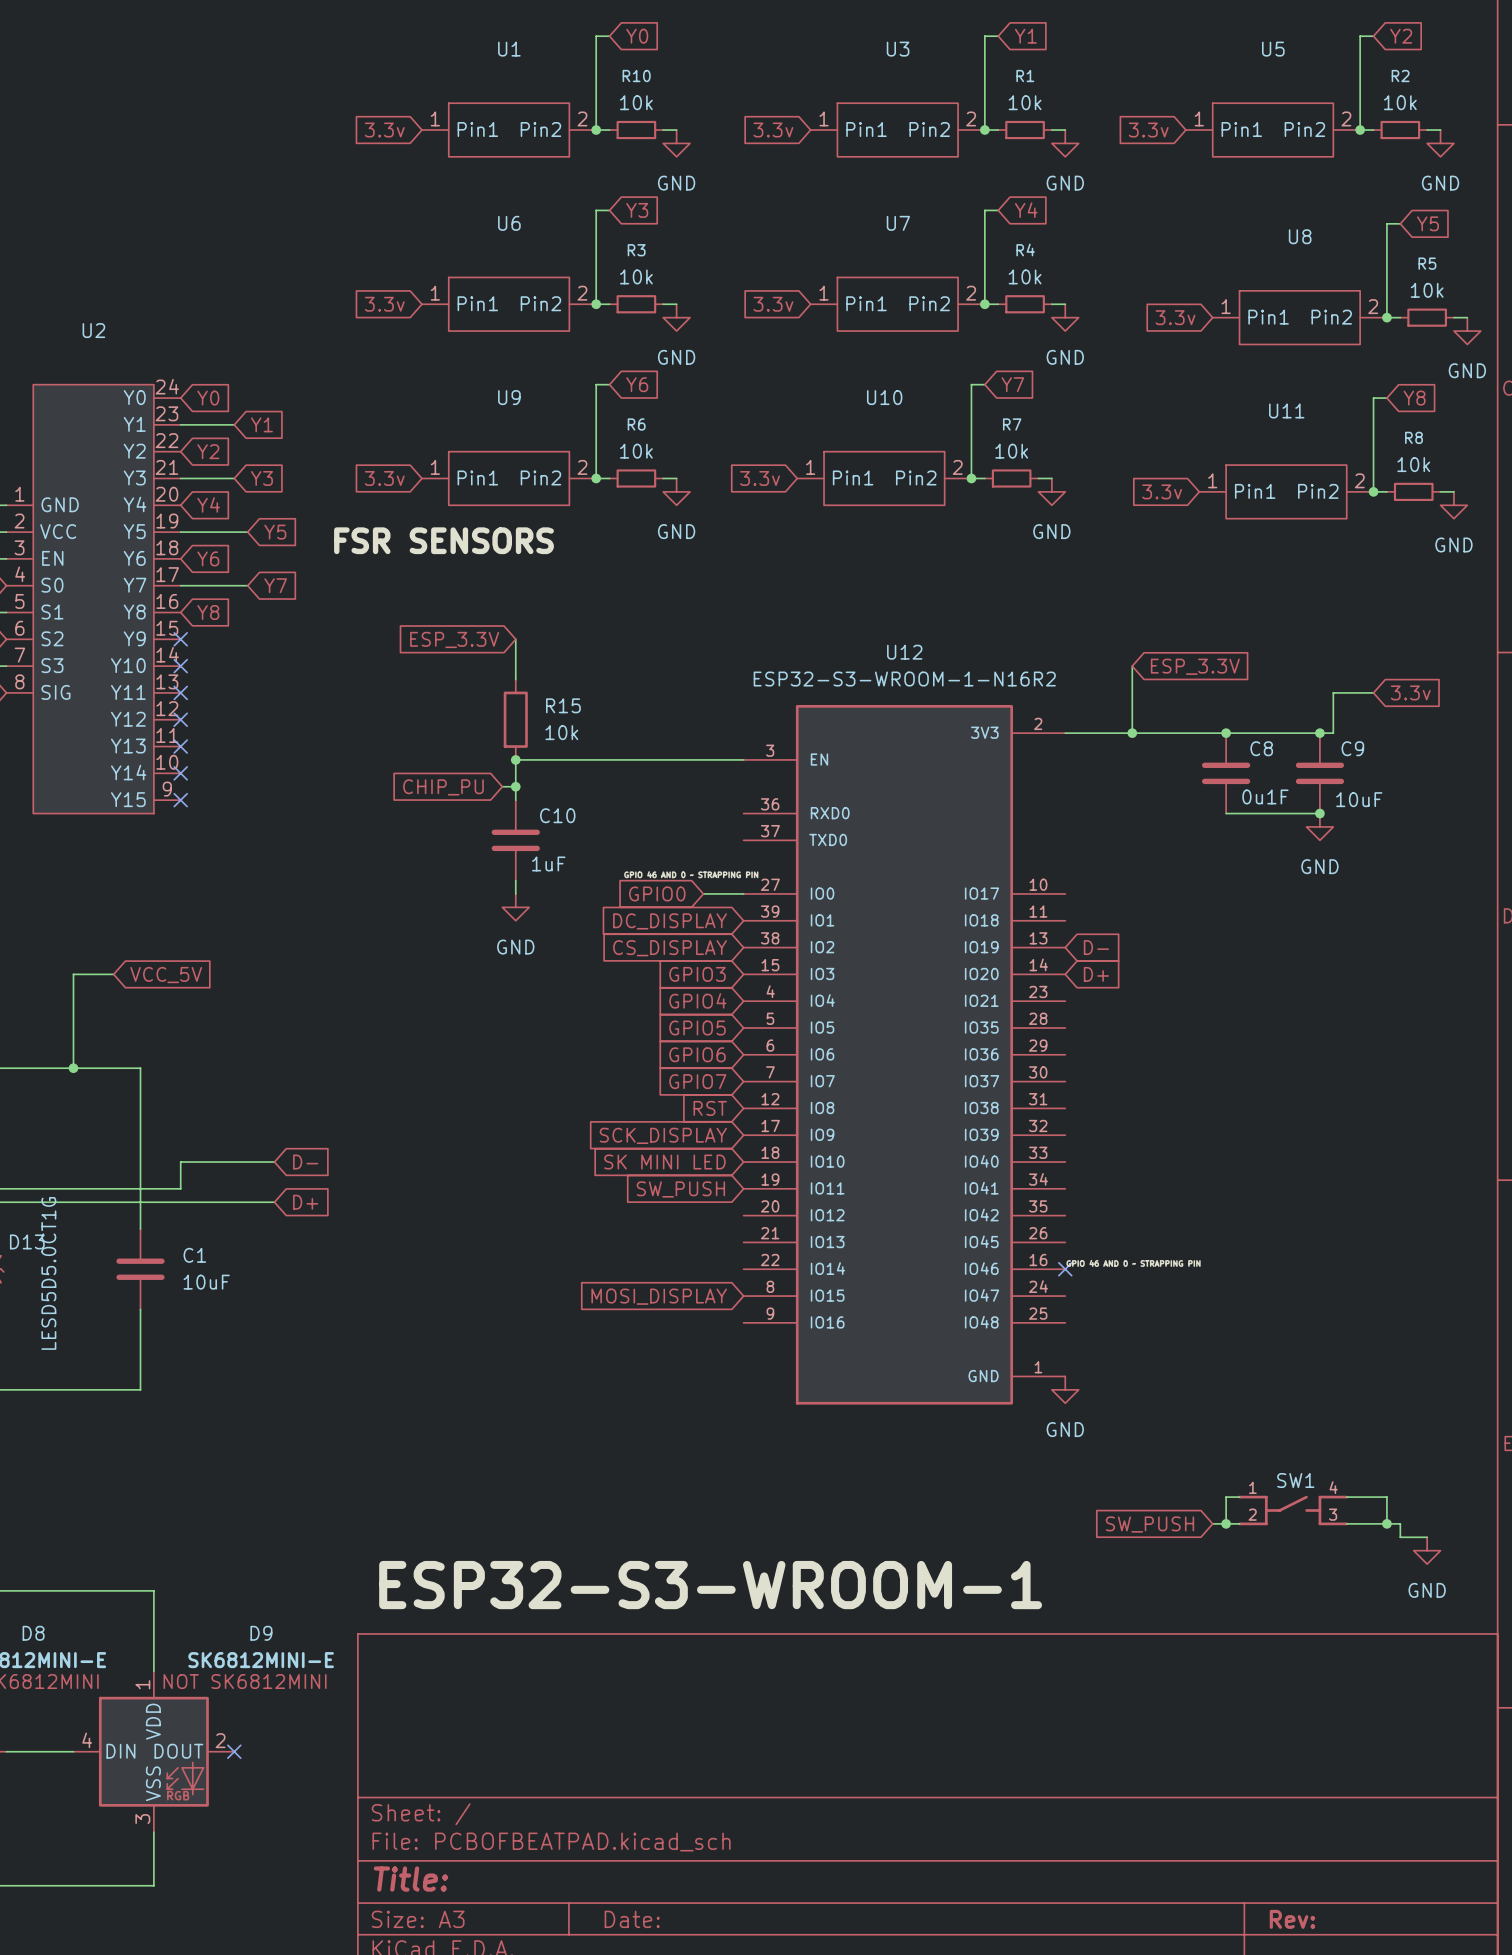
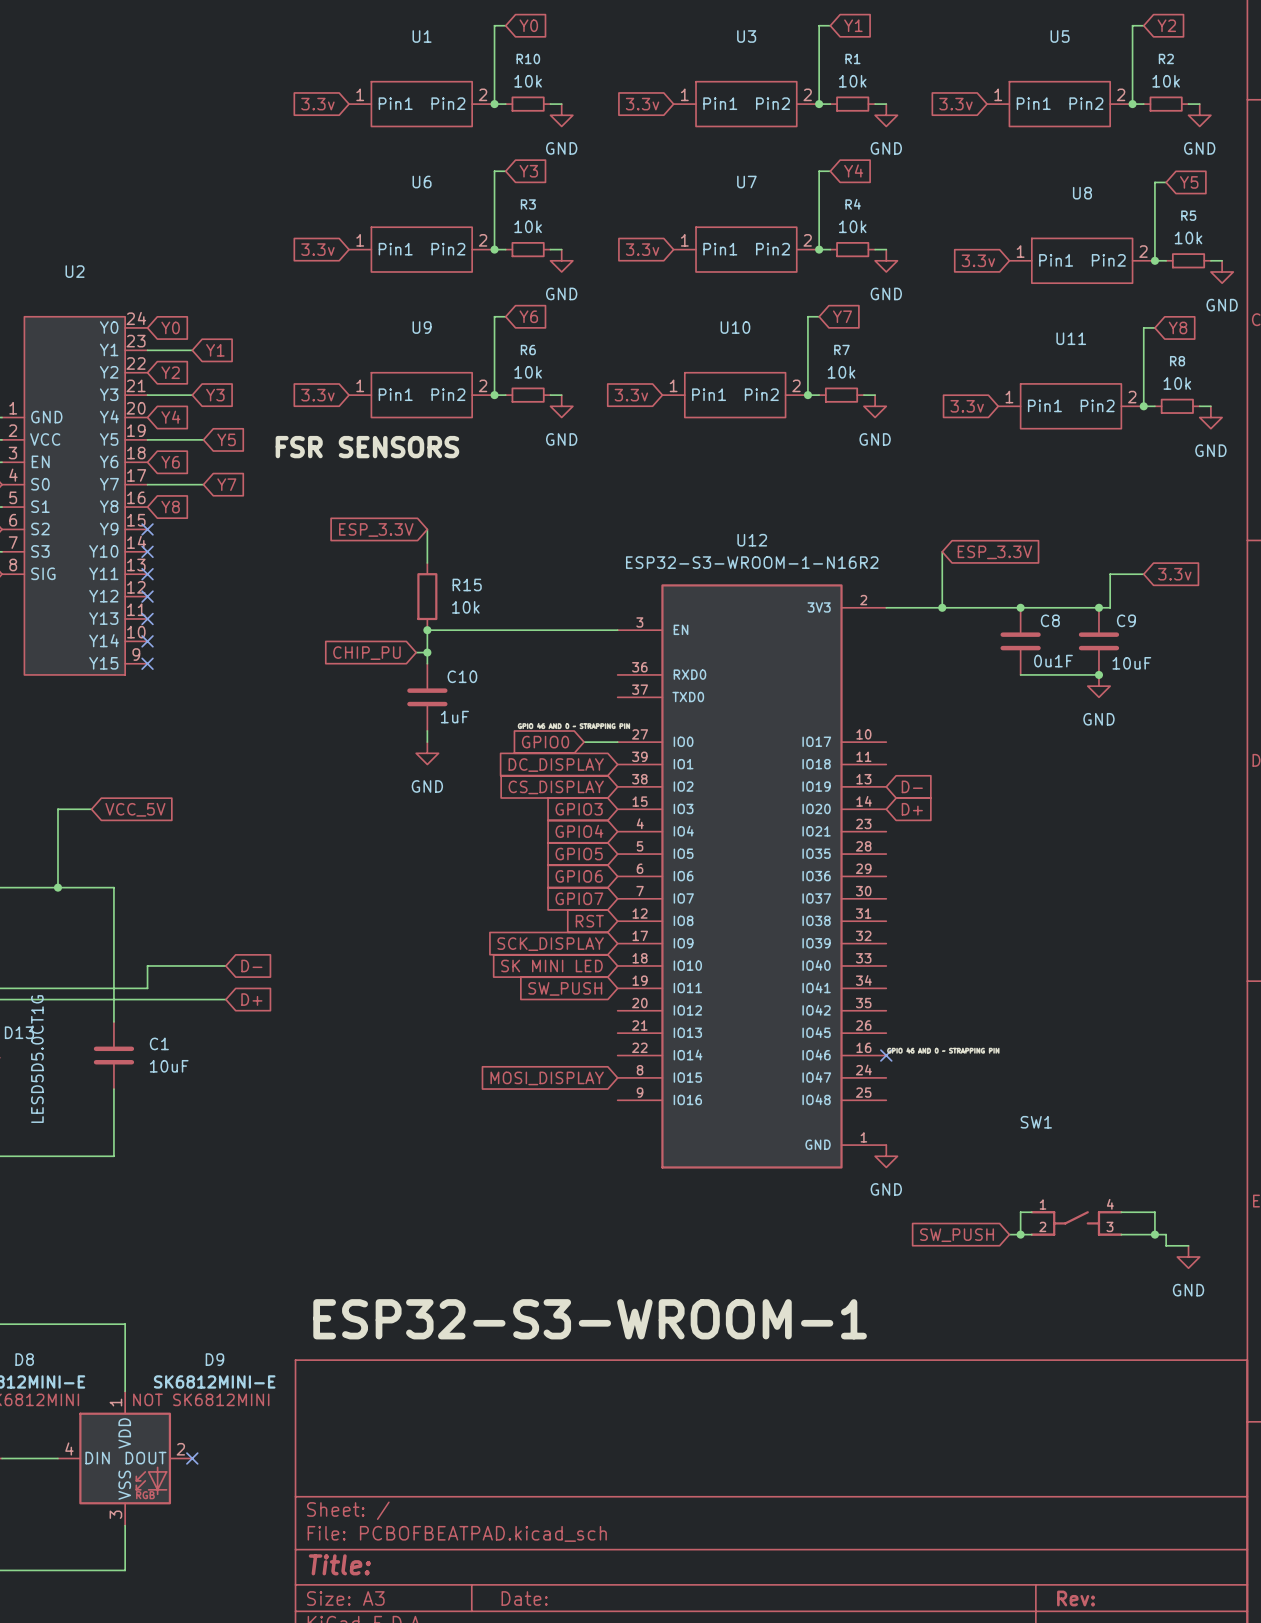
SW1 name position: SW1 (1295, 1480) -> SW1 (1036, 1122)
wire: (1239, 1497) (1226, 1497) (1226, 1523) -> (1031, 1212) (1020, 1212) (1020, 1234)
wire: (1346, 1497) (1386, 1497) (1386, 1523) -> (1121, 1212) (1154, 1212) (1154, 1234)
SW1 position: (1293, 1510) -> (1076, 1223)
wire: (1212, 1523) (1239, 1523) -> (1009, 1234) (1031, 1234)
junction position: (1226, 1523) -> (1020, 1234)
wire: (1346, 1523) (1400, 1523) (1400, 1537) (1427, 1537) -> (1121, 1234) (1166, 1234) (1166, 1245) (1188, 1245)
junction position: (1386, 1523) -> (1154, 1234)
global label position: SW_PUSH (1149, 1524) -> SW_PUSH (957, 1235)
power symbol position: GND (1427, 1550) -> GND (1188, 1257)

